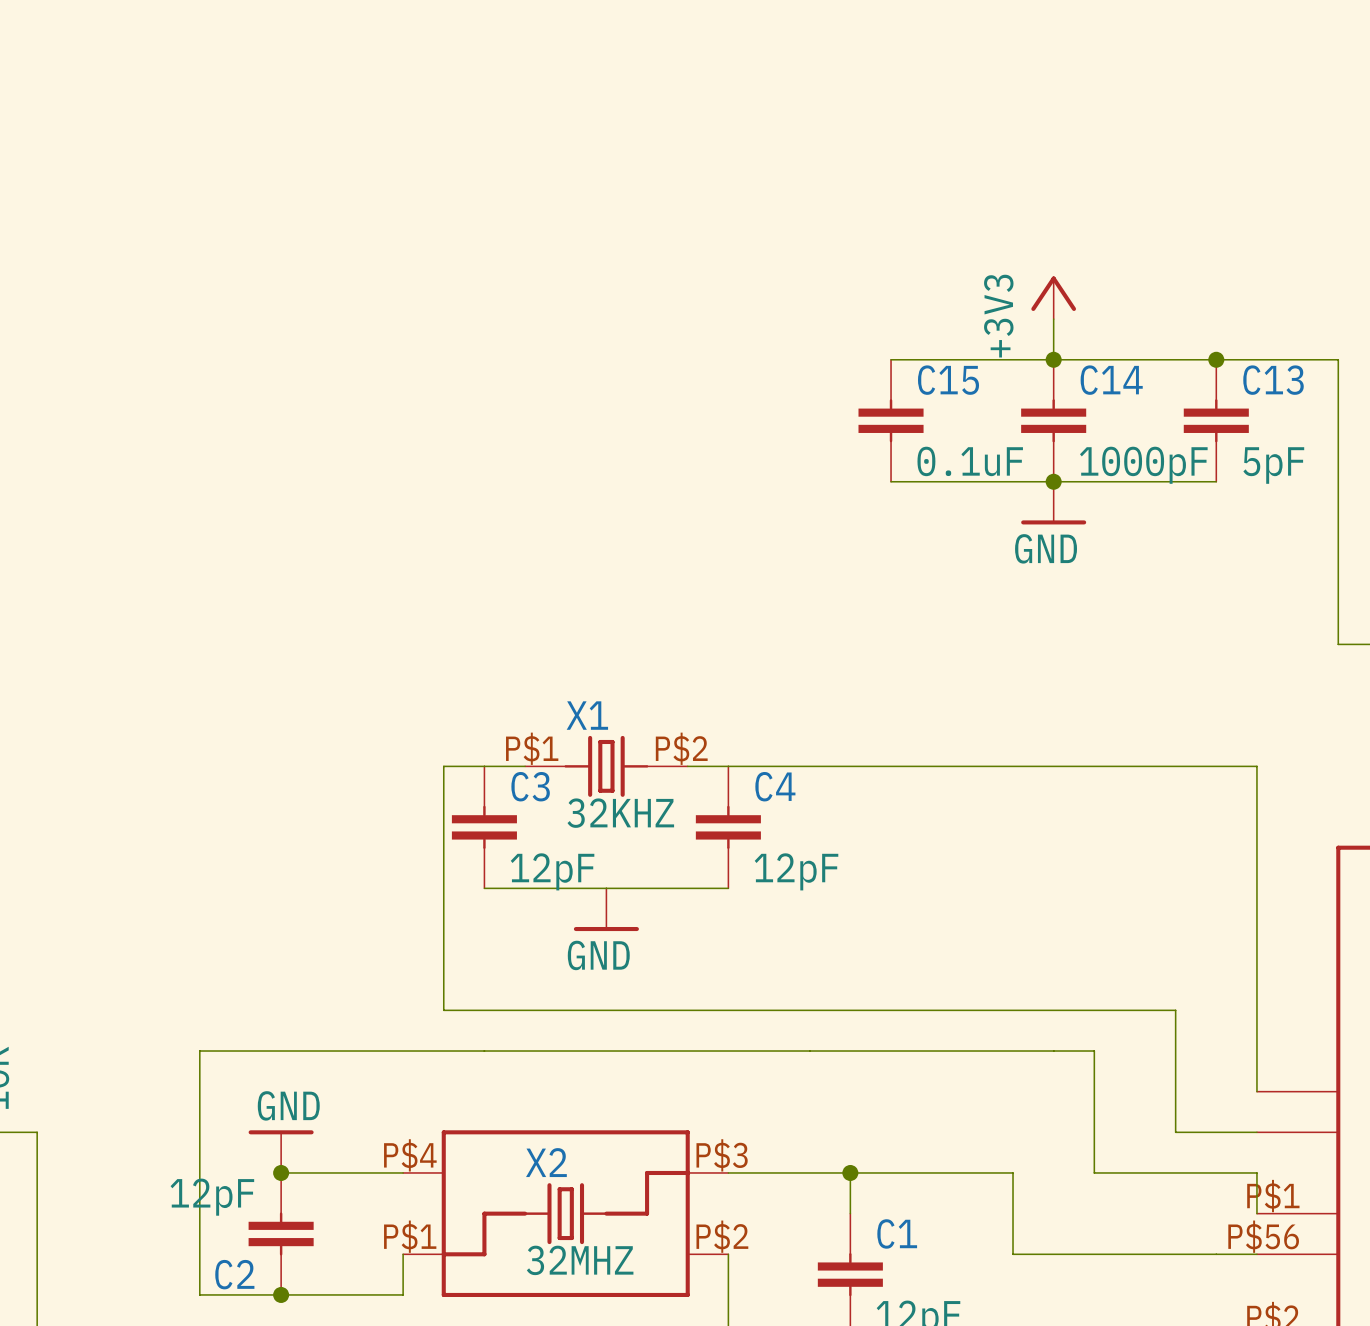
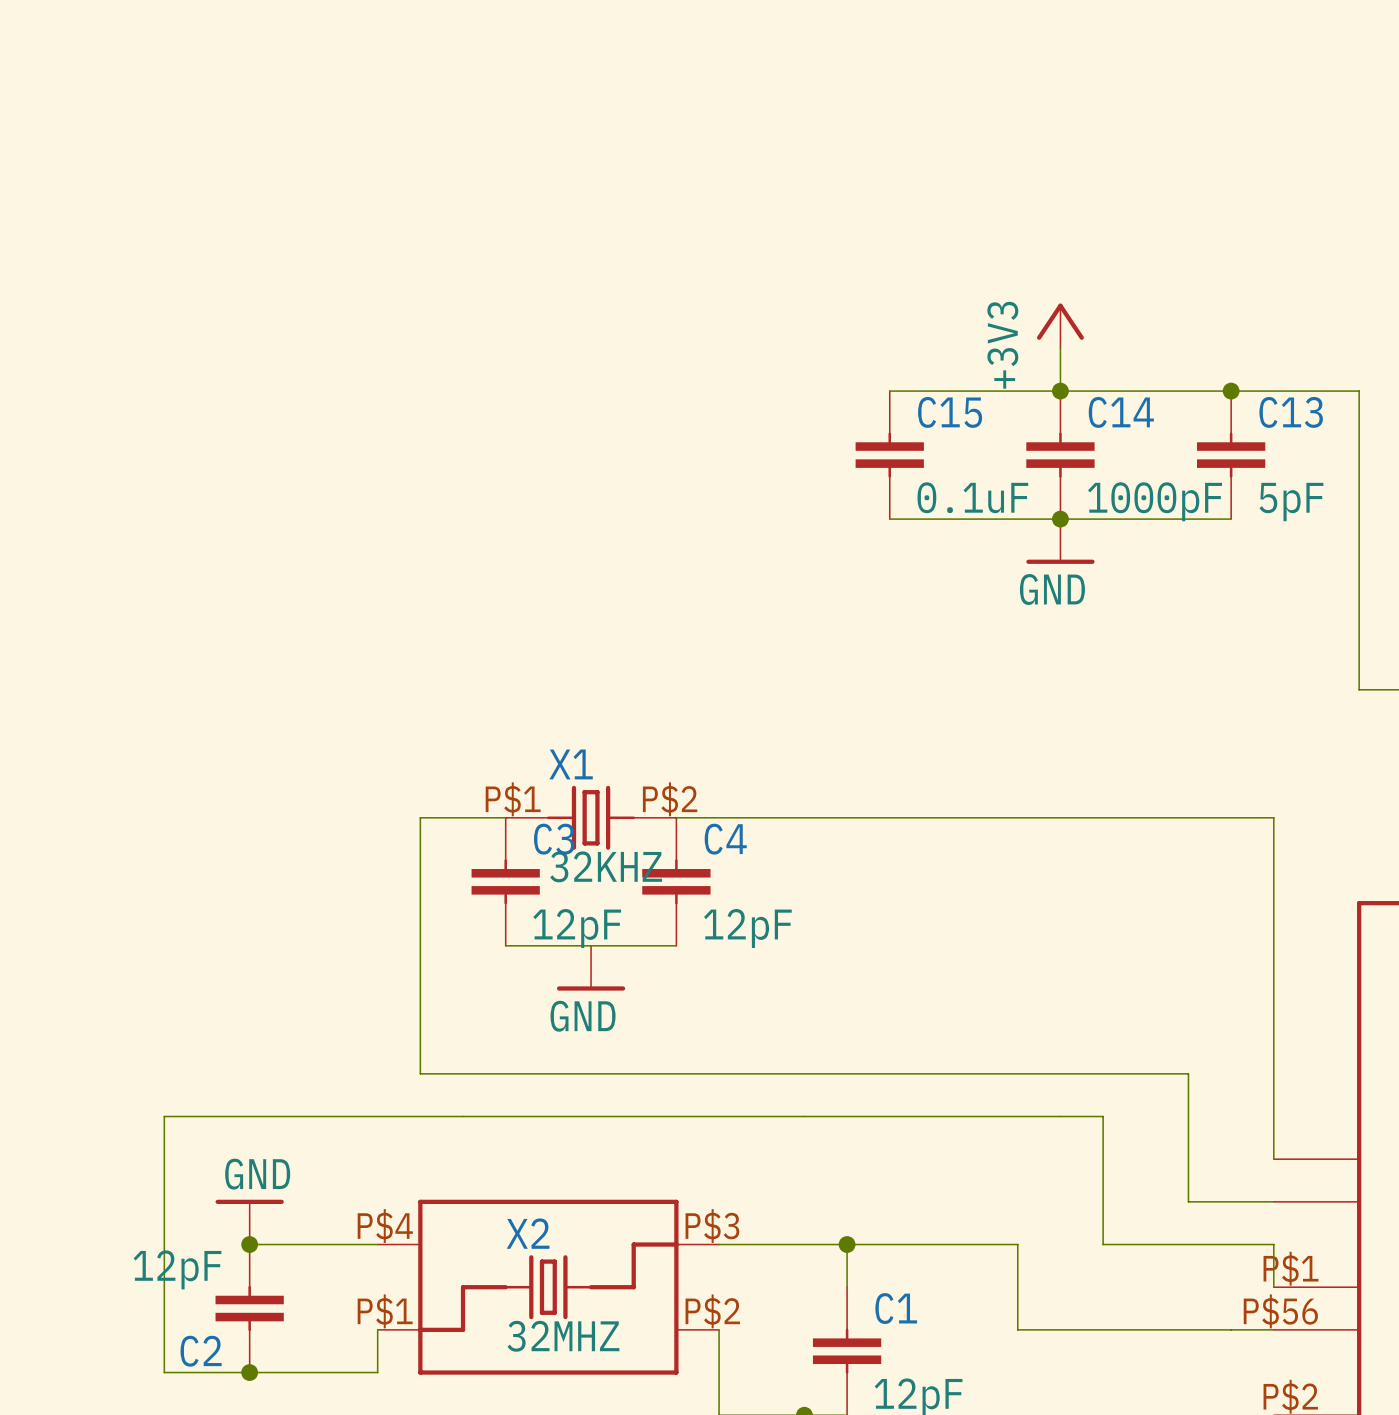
C3 position: (484, 827) -> (505, 881)
C4 position: (728, 827) -> (676, 881)
wire: (484, 888) (525, 888) -> none
wire: (687, 888) (728, 888) -> none

